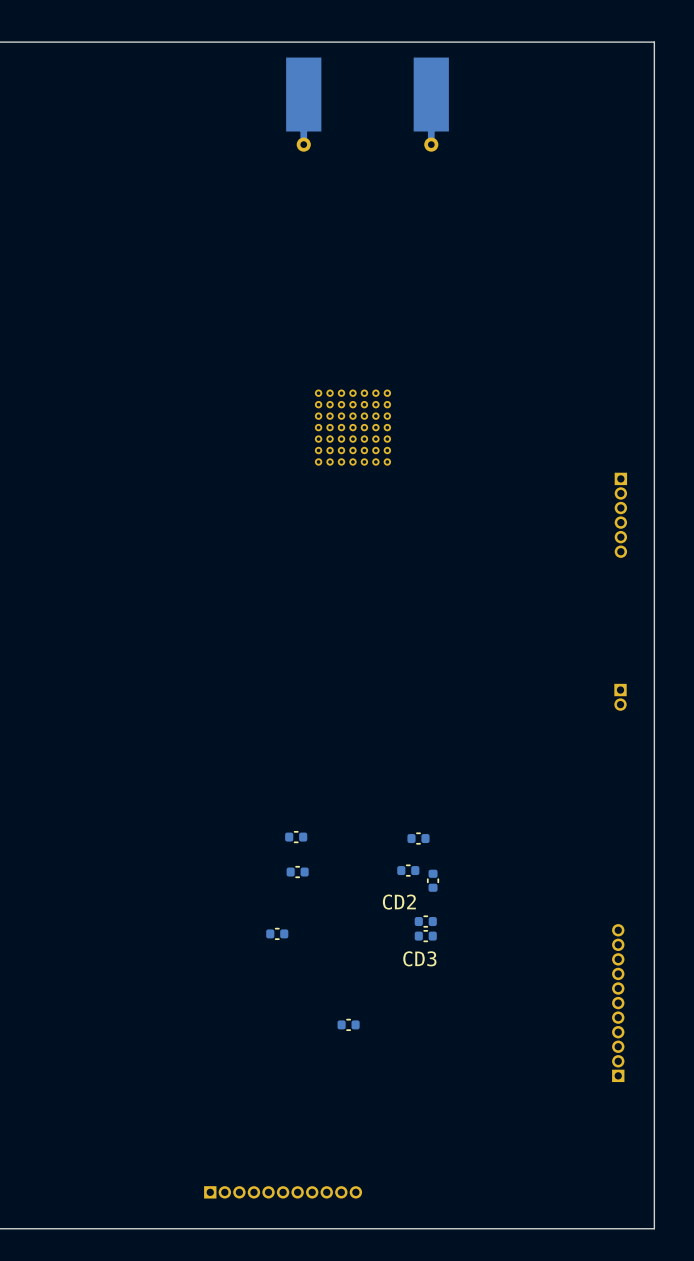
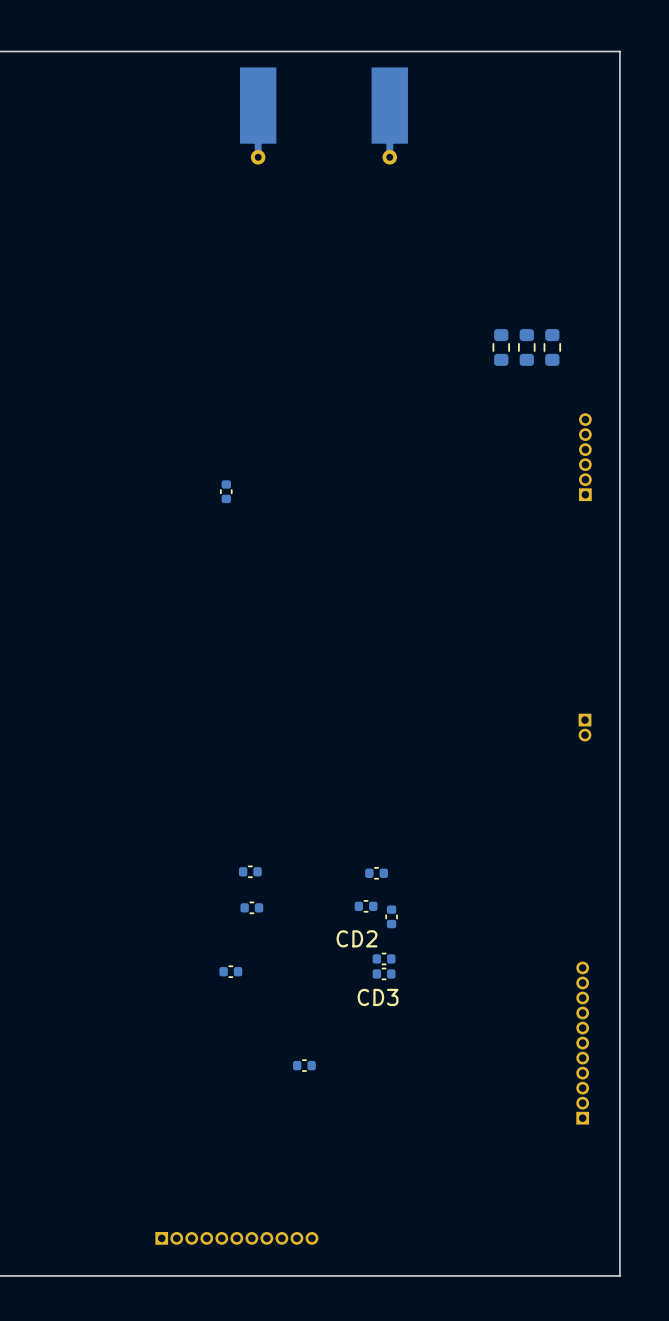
part: none -> (501, 347)
part: none -> (526, 347)
part: none -> (552, 347)
part: (352, 427) -> none
part: none -> (226, 491)
part rotation: 0° (620, 515) -> 180° (585, 457)
part position: (620, 515) -> (585, 457)

